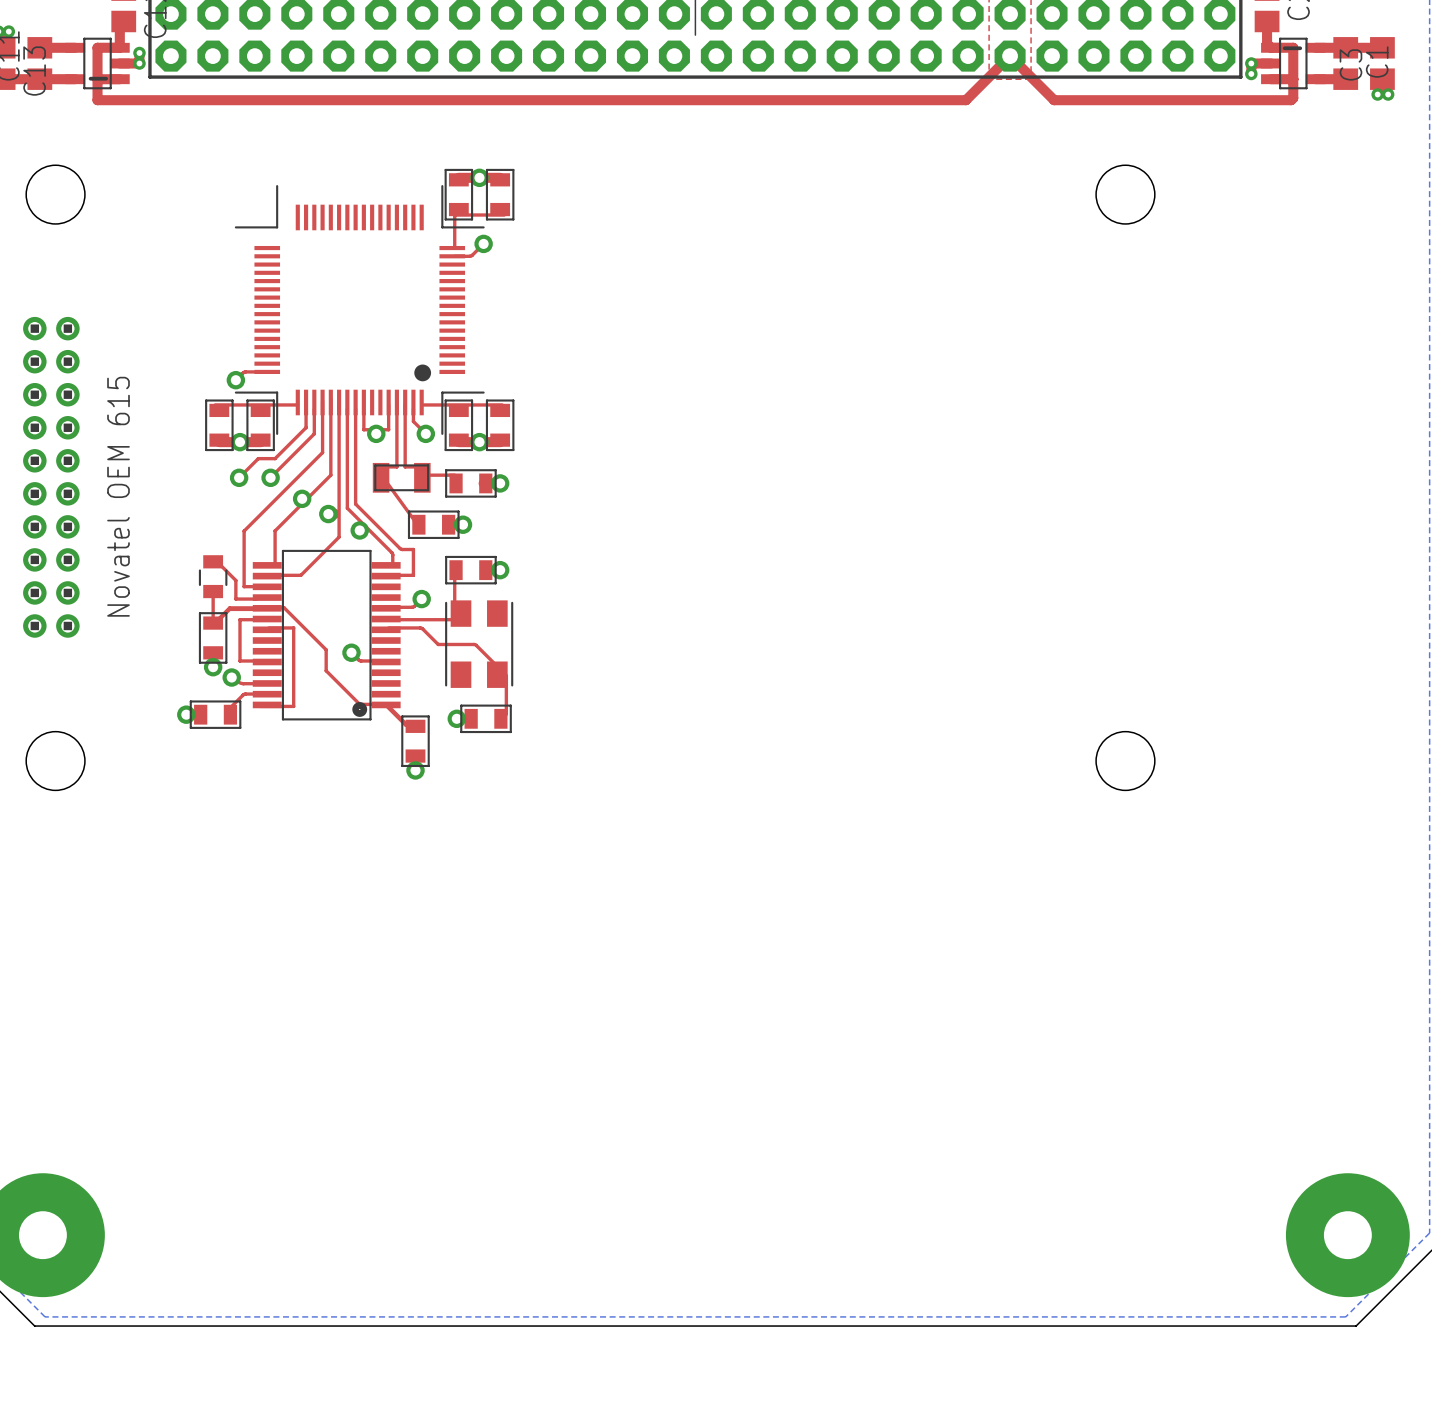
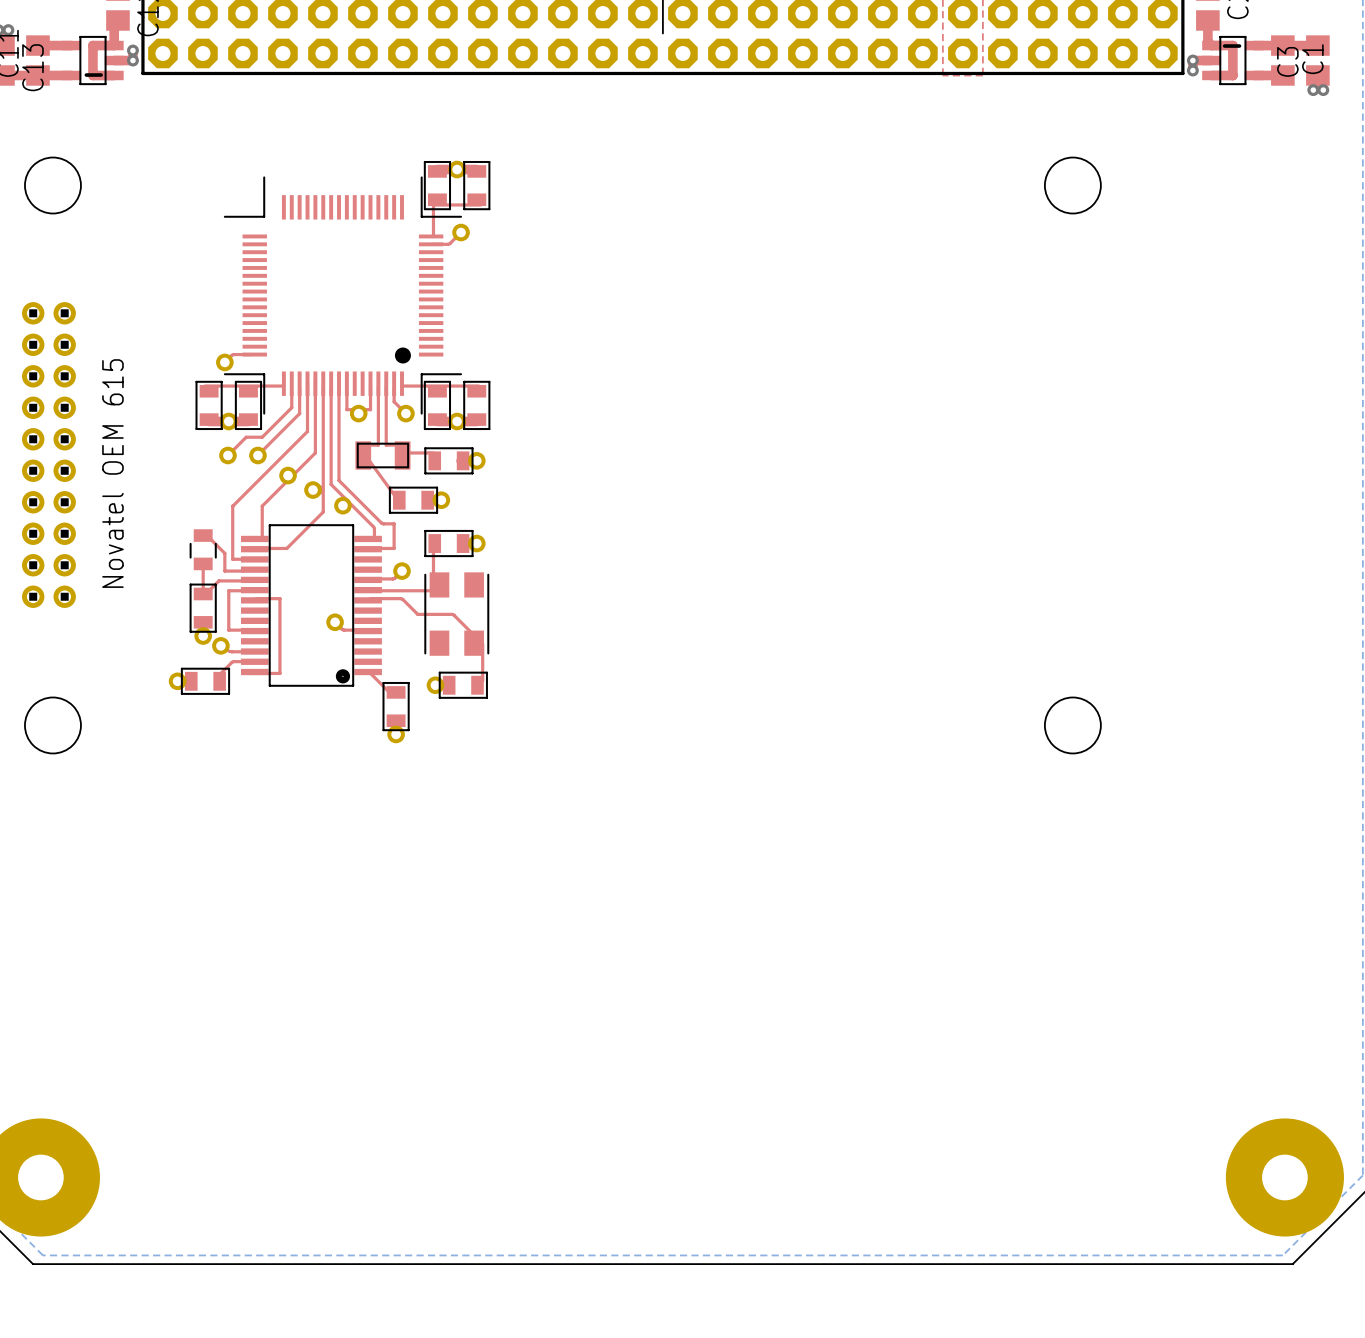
top track: (97, 79) (97, 100) (965, 100) (1010, 56) (1054, 100) (1291, 100) (1293, 98) (1293, 79) -> none
top track: (213, 621) (215, 621) (229, 607) (284, 607) (326, 649) (326, 670) (359, 704) (384, 704) (405, 725) (415, 725) -> none

